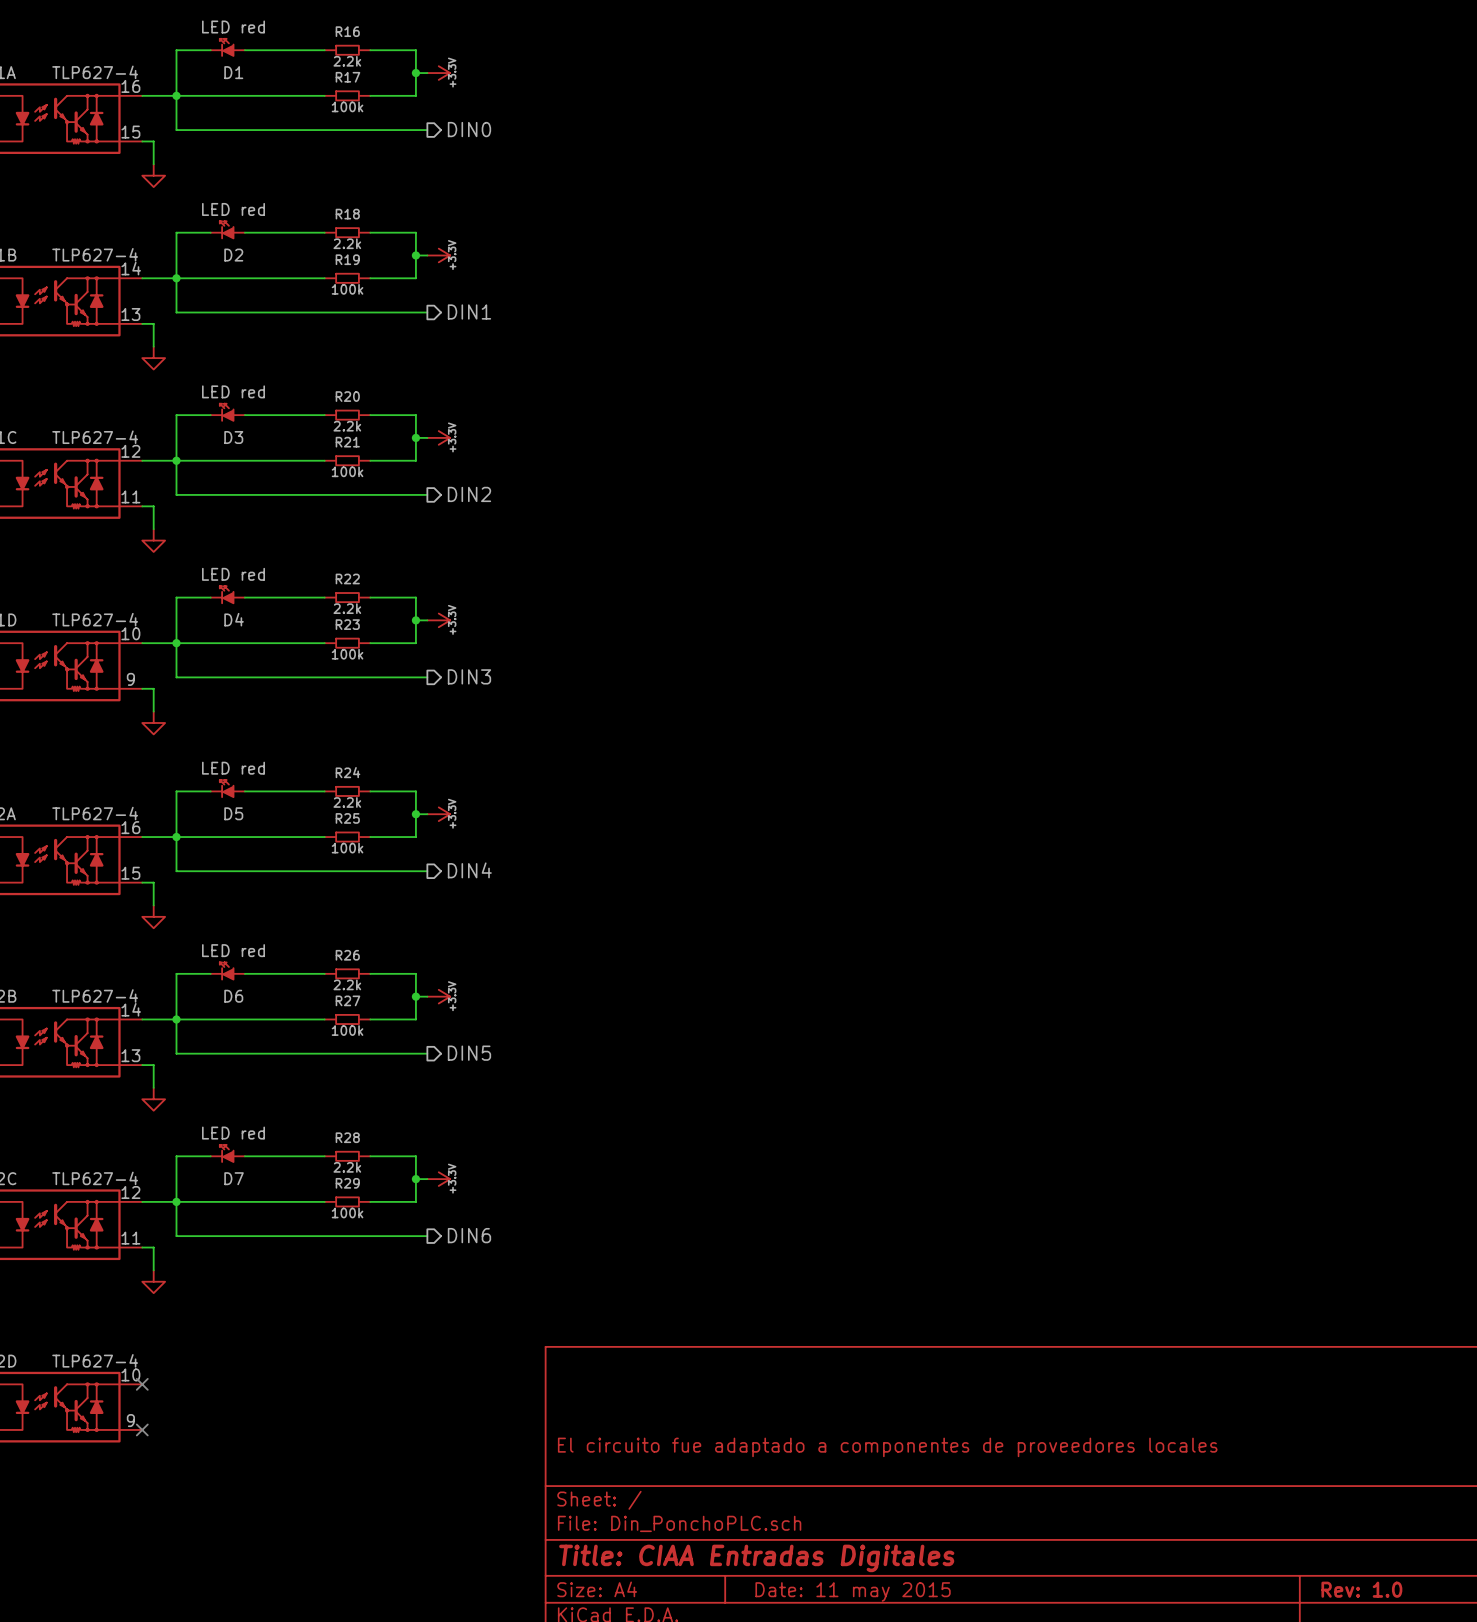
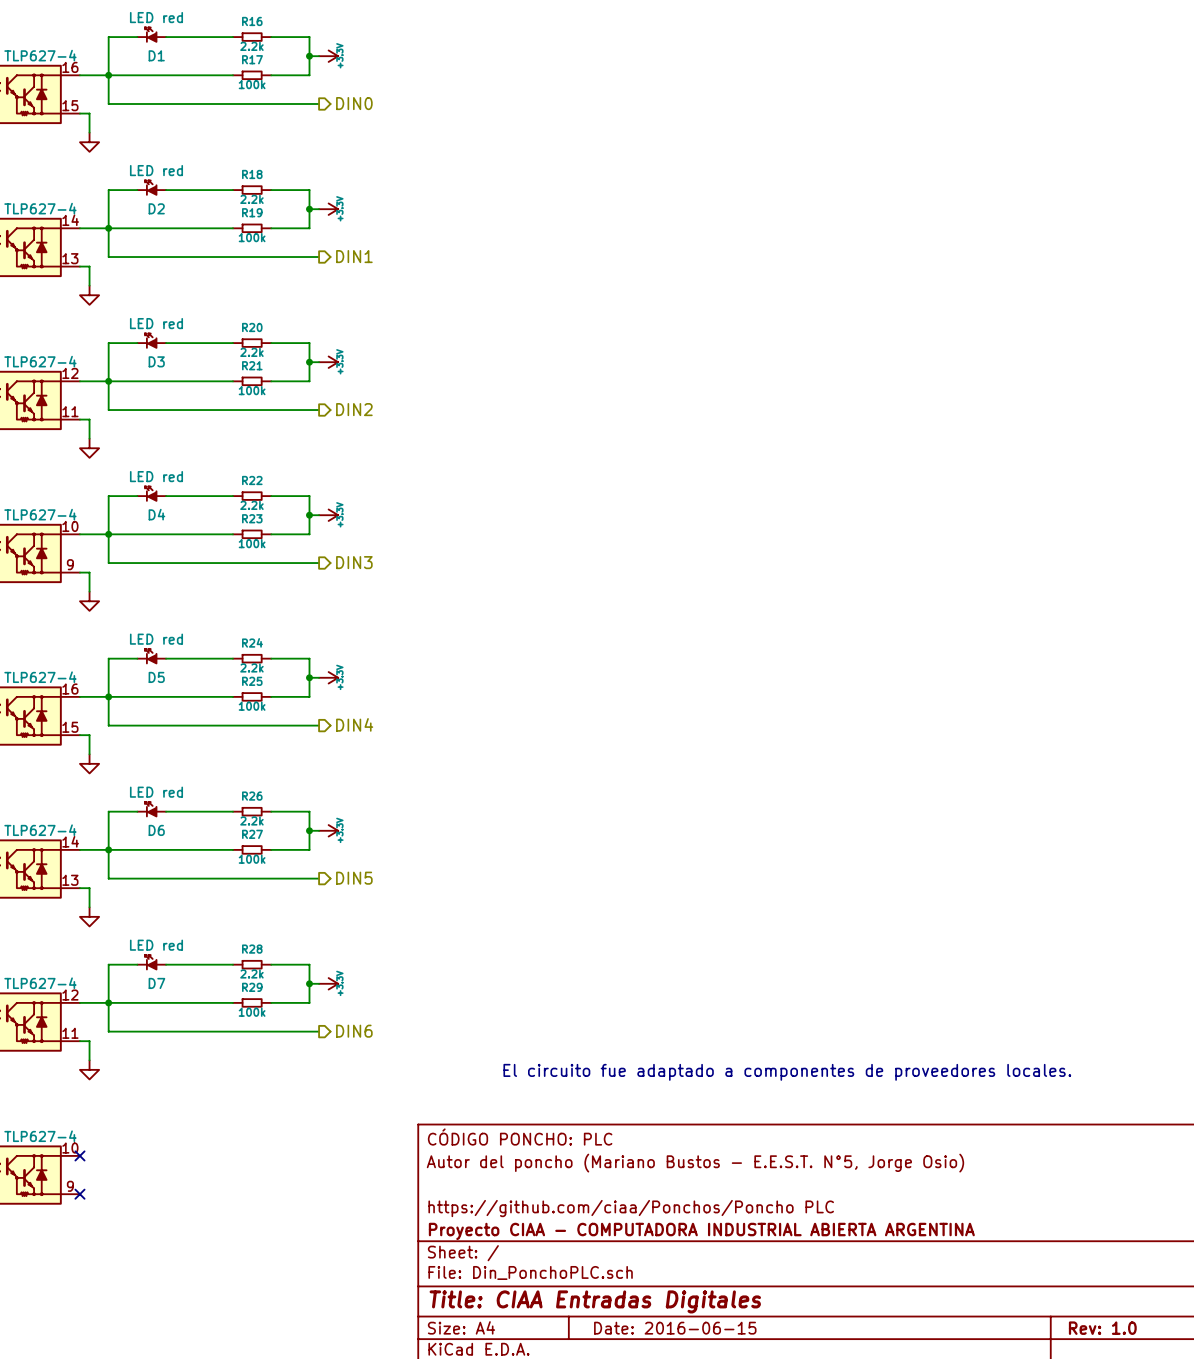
text: none -> El circuito fue adaptado a componentes de proveedores locales. (787, 1072)
title block: none -> CÓDIGO PONCHO: PLC (520, 1137)
title block: none -> Autor del poncho (Mariano Bustos - E.E.S.T. N°5, Jorge Osio) (695, 1163)
title block: El circuito fue adaptado a componentes de proveedores locales (887, 1447) -> https://github.com/ciaa/Ponchos/Poncho PLC (631, 1208)
title block: none -> Proyecto CIAA - COMPUTADORA INDUSTRIAL ABIERTA ARGENTINA (701, 1231)
title block: Date: 11 may 2015 (853, 1591) -> Date: 2016-06-15 (675, 1328)

